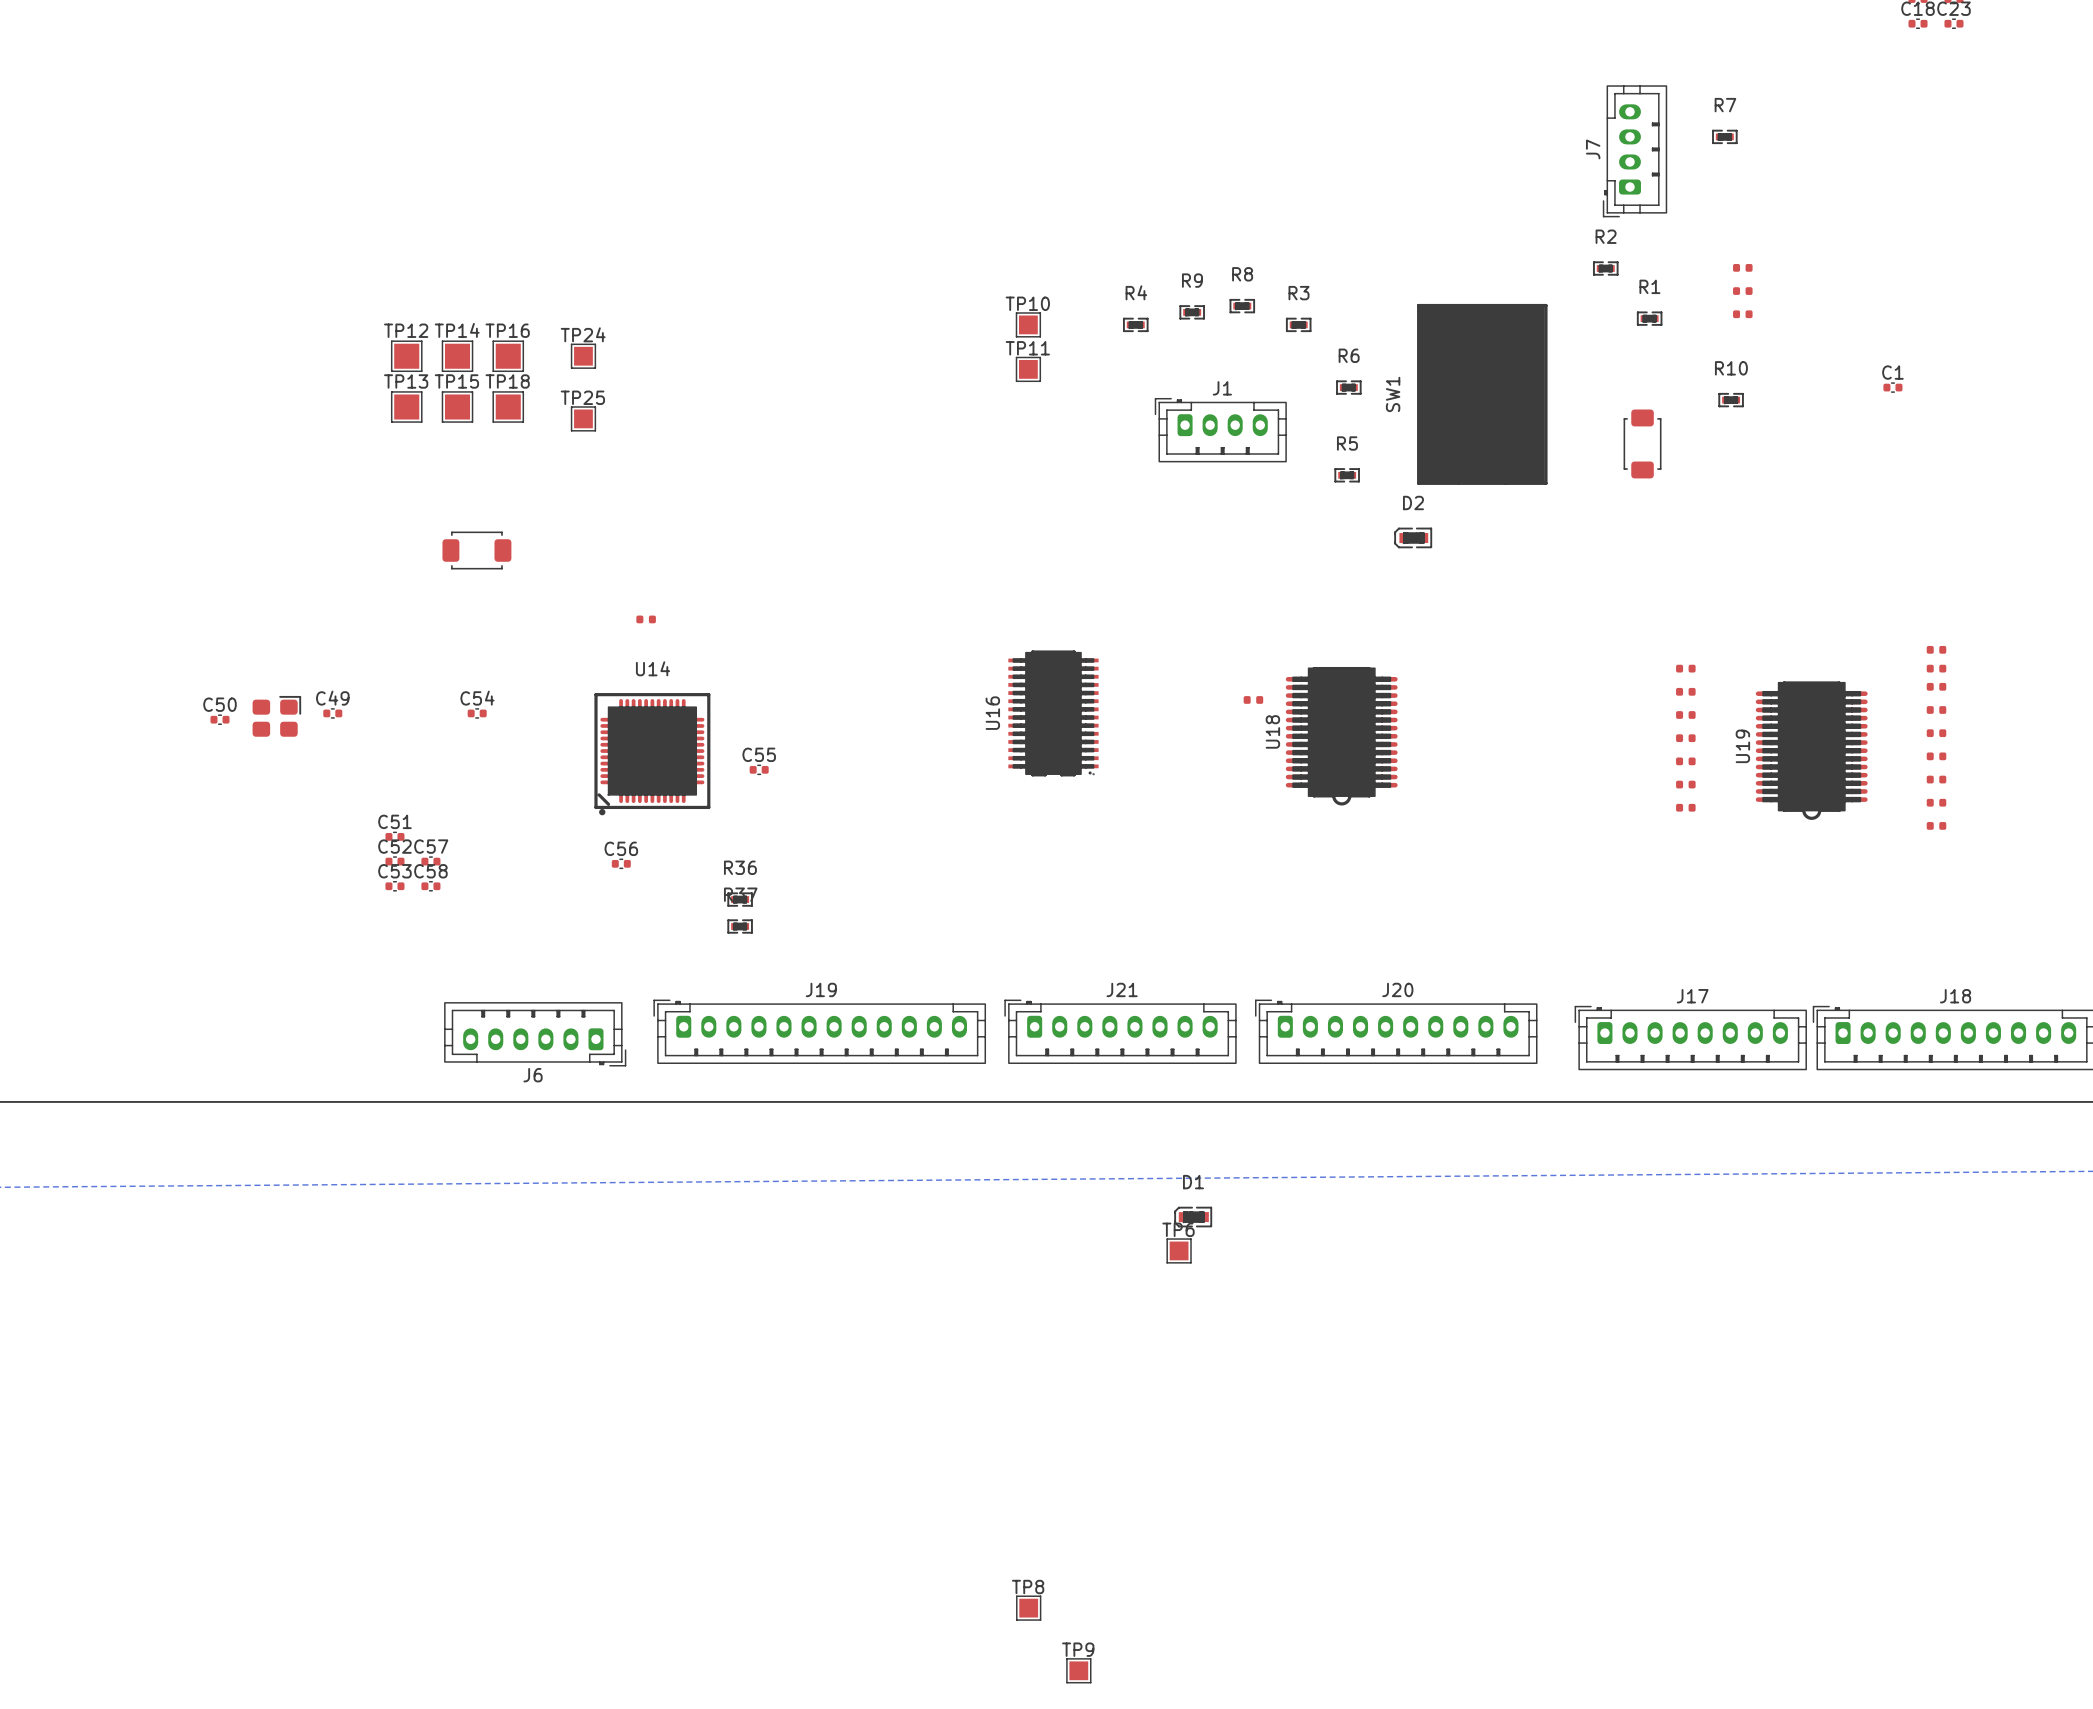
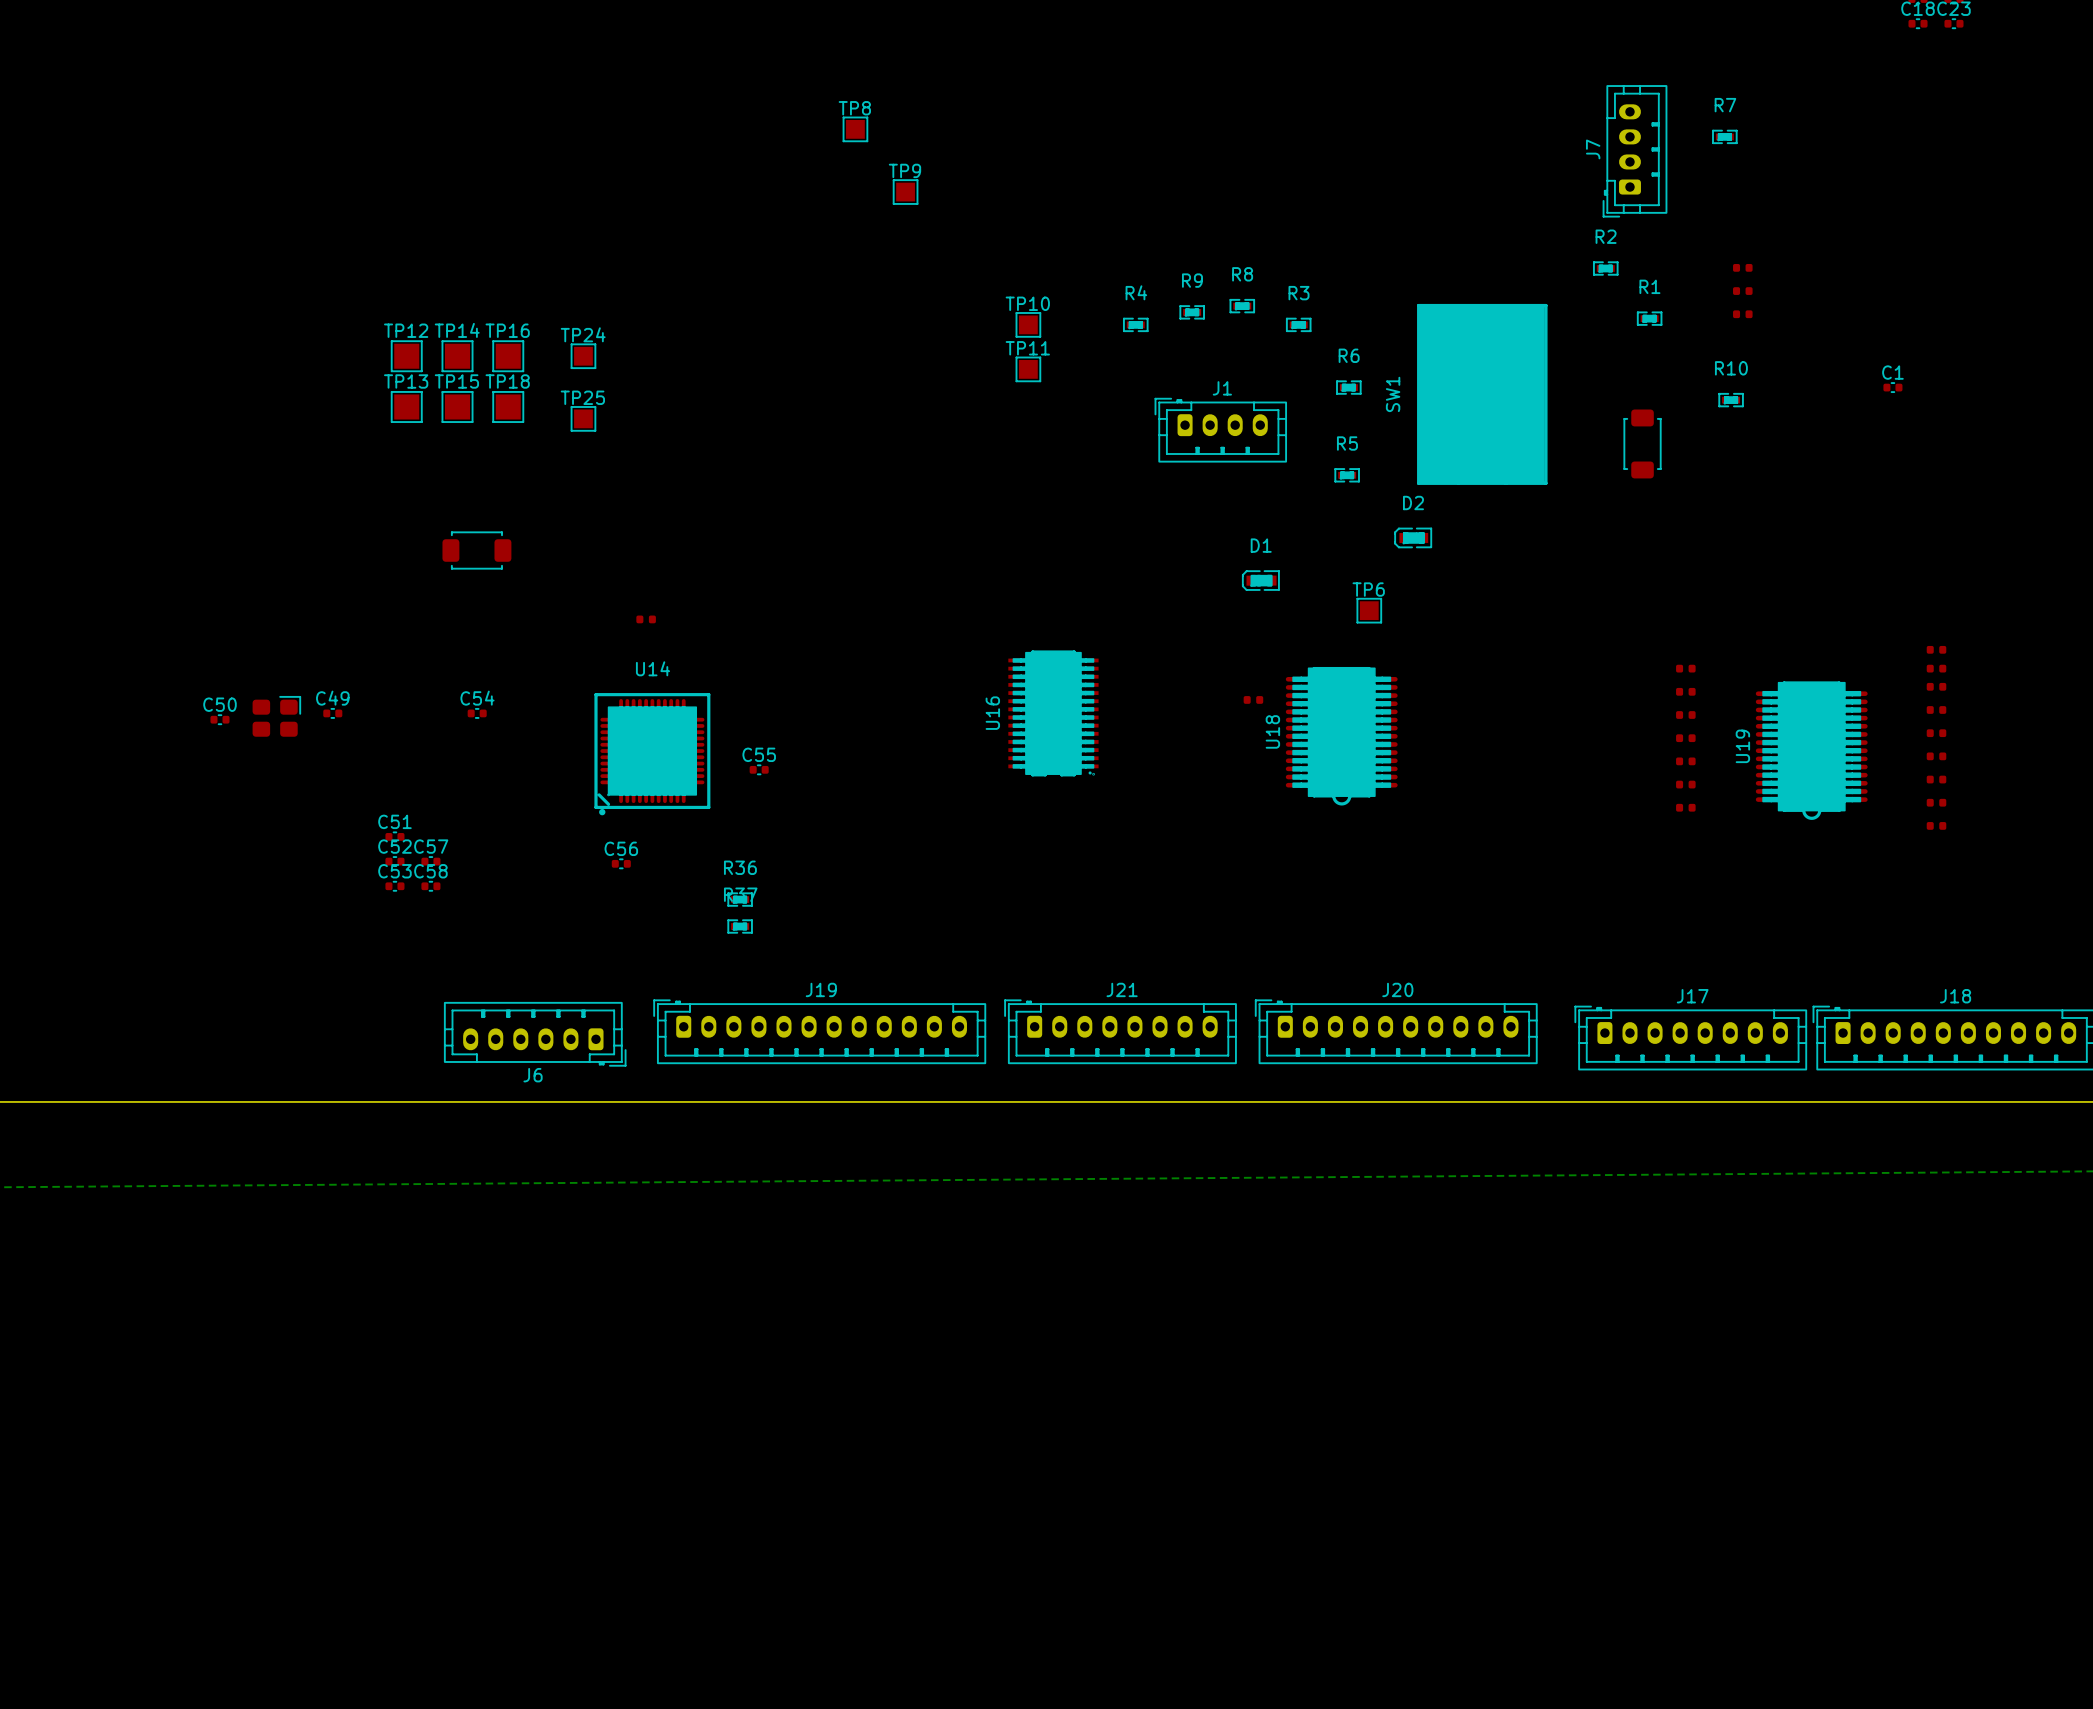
D1 position: (1193, 1217) -> (1260, 580)
TP6 position: (1179, 1250) -> (1369, 610)
TP8 position: (1028, 1608) -> (855, 129)
TP9 position: (1078, 1670) -> (905, 192)

